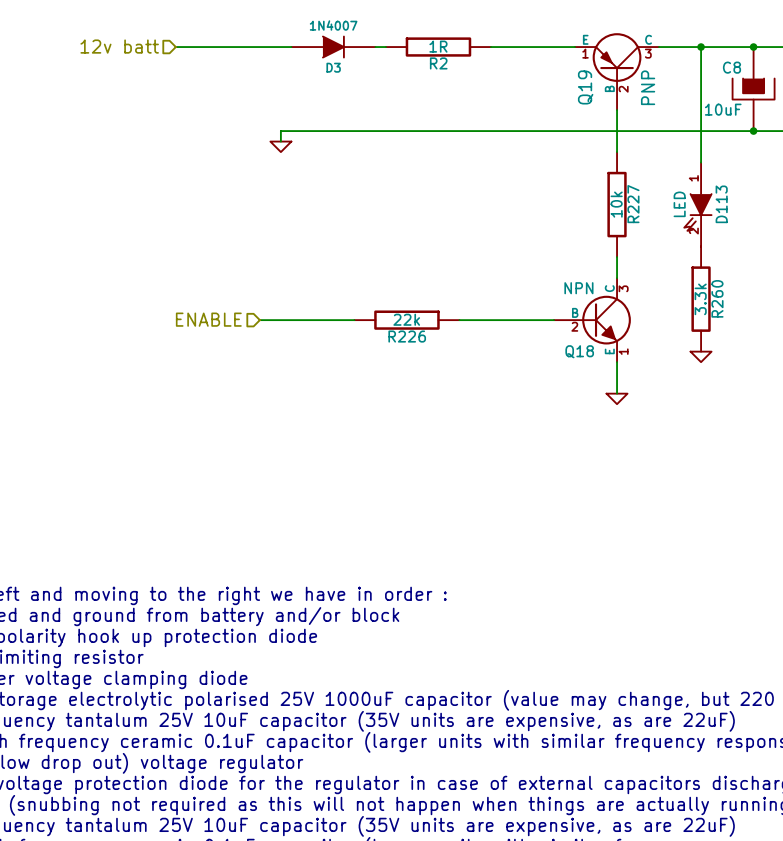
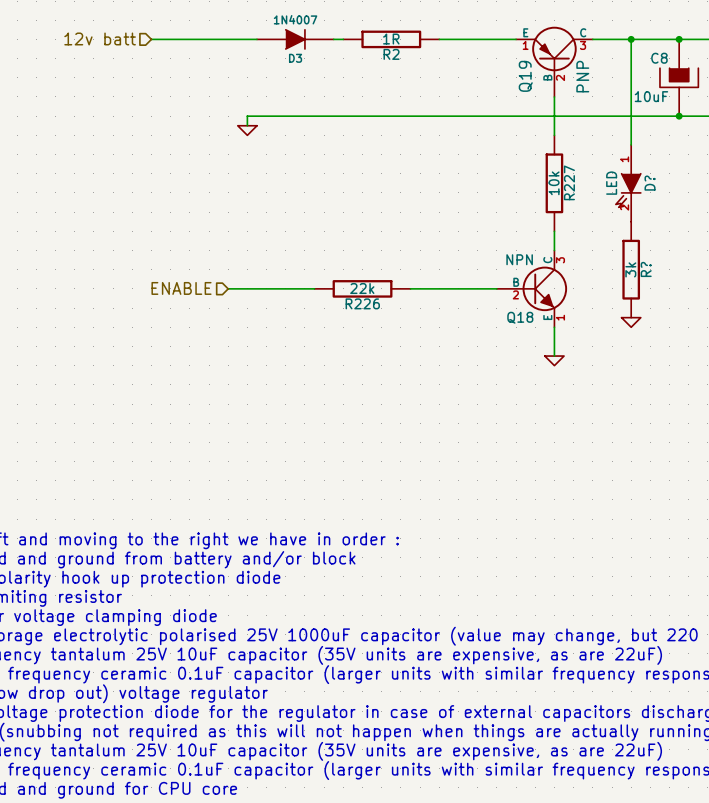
D113 name: D113 (721, 204) -> D? (650, 183)
R260 name: R260 (717, 298) -> R? (646, 269)
R260 value: 3.3k (700, 299) -> 3k (630, 269)

